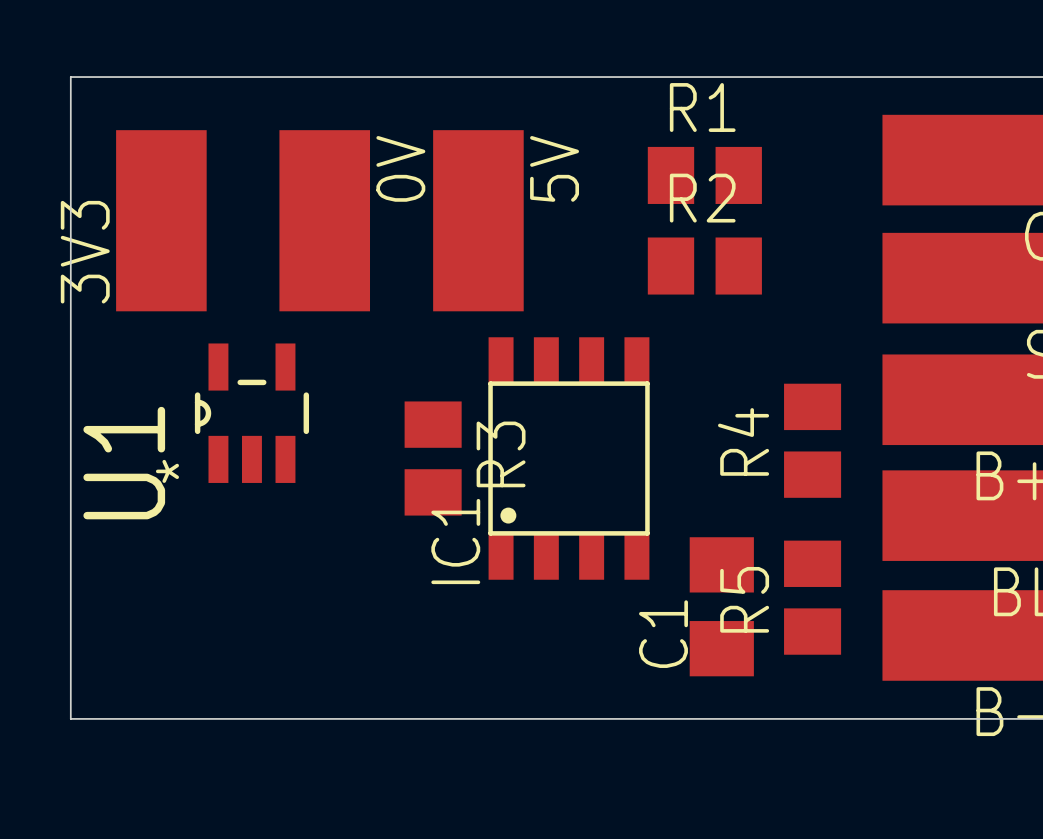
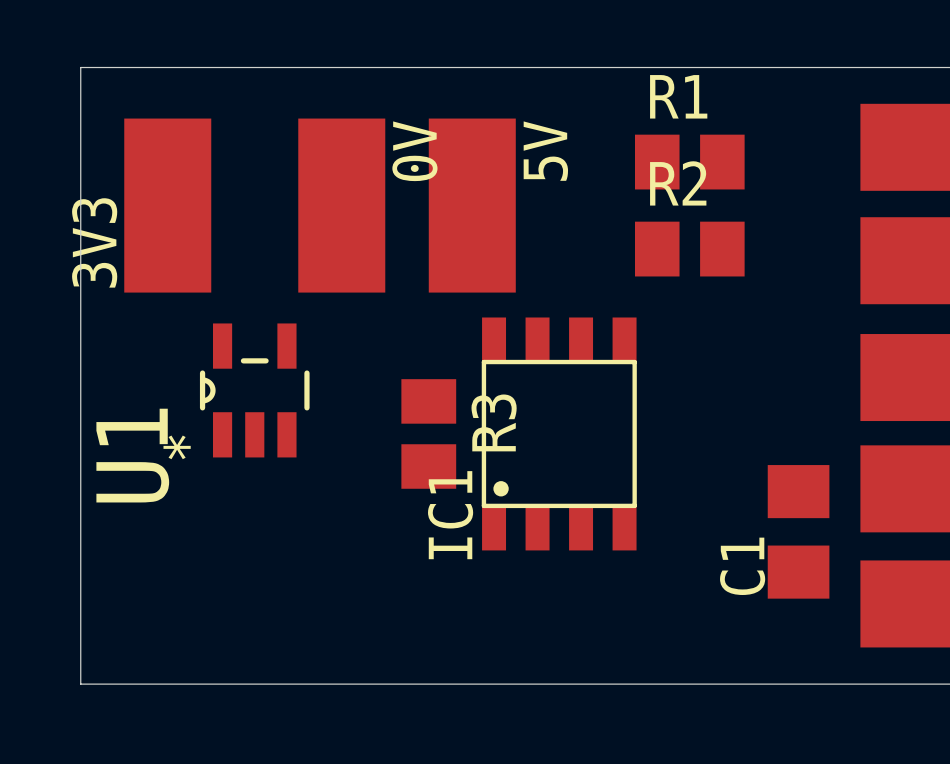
0V position: (324, 220) -> (341, 205)
R4: (812, 440) -> none
R5: (812, 597) -> none
C1 position: (721, 606) -> (798, 531)

